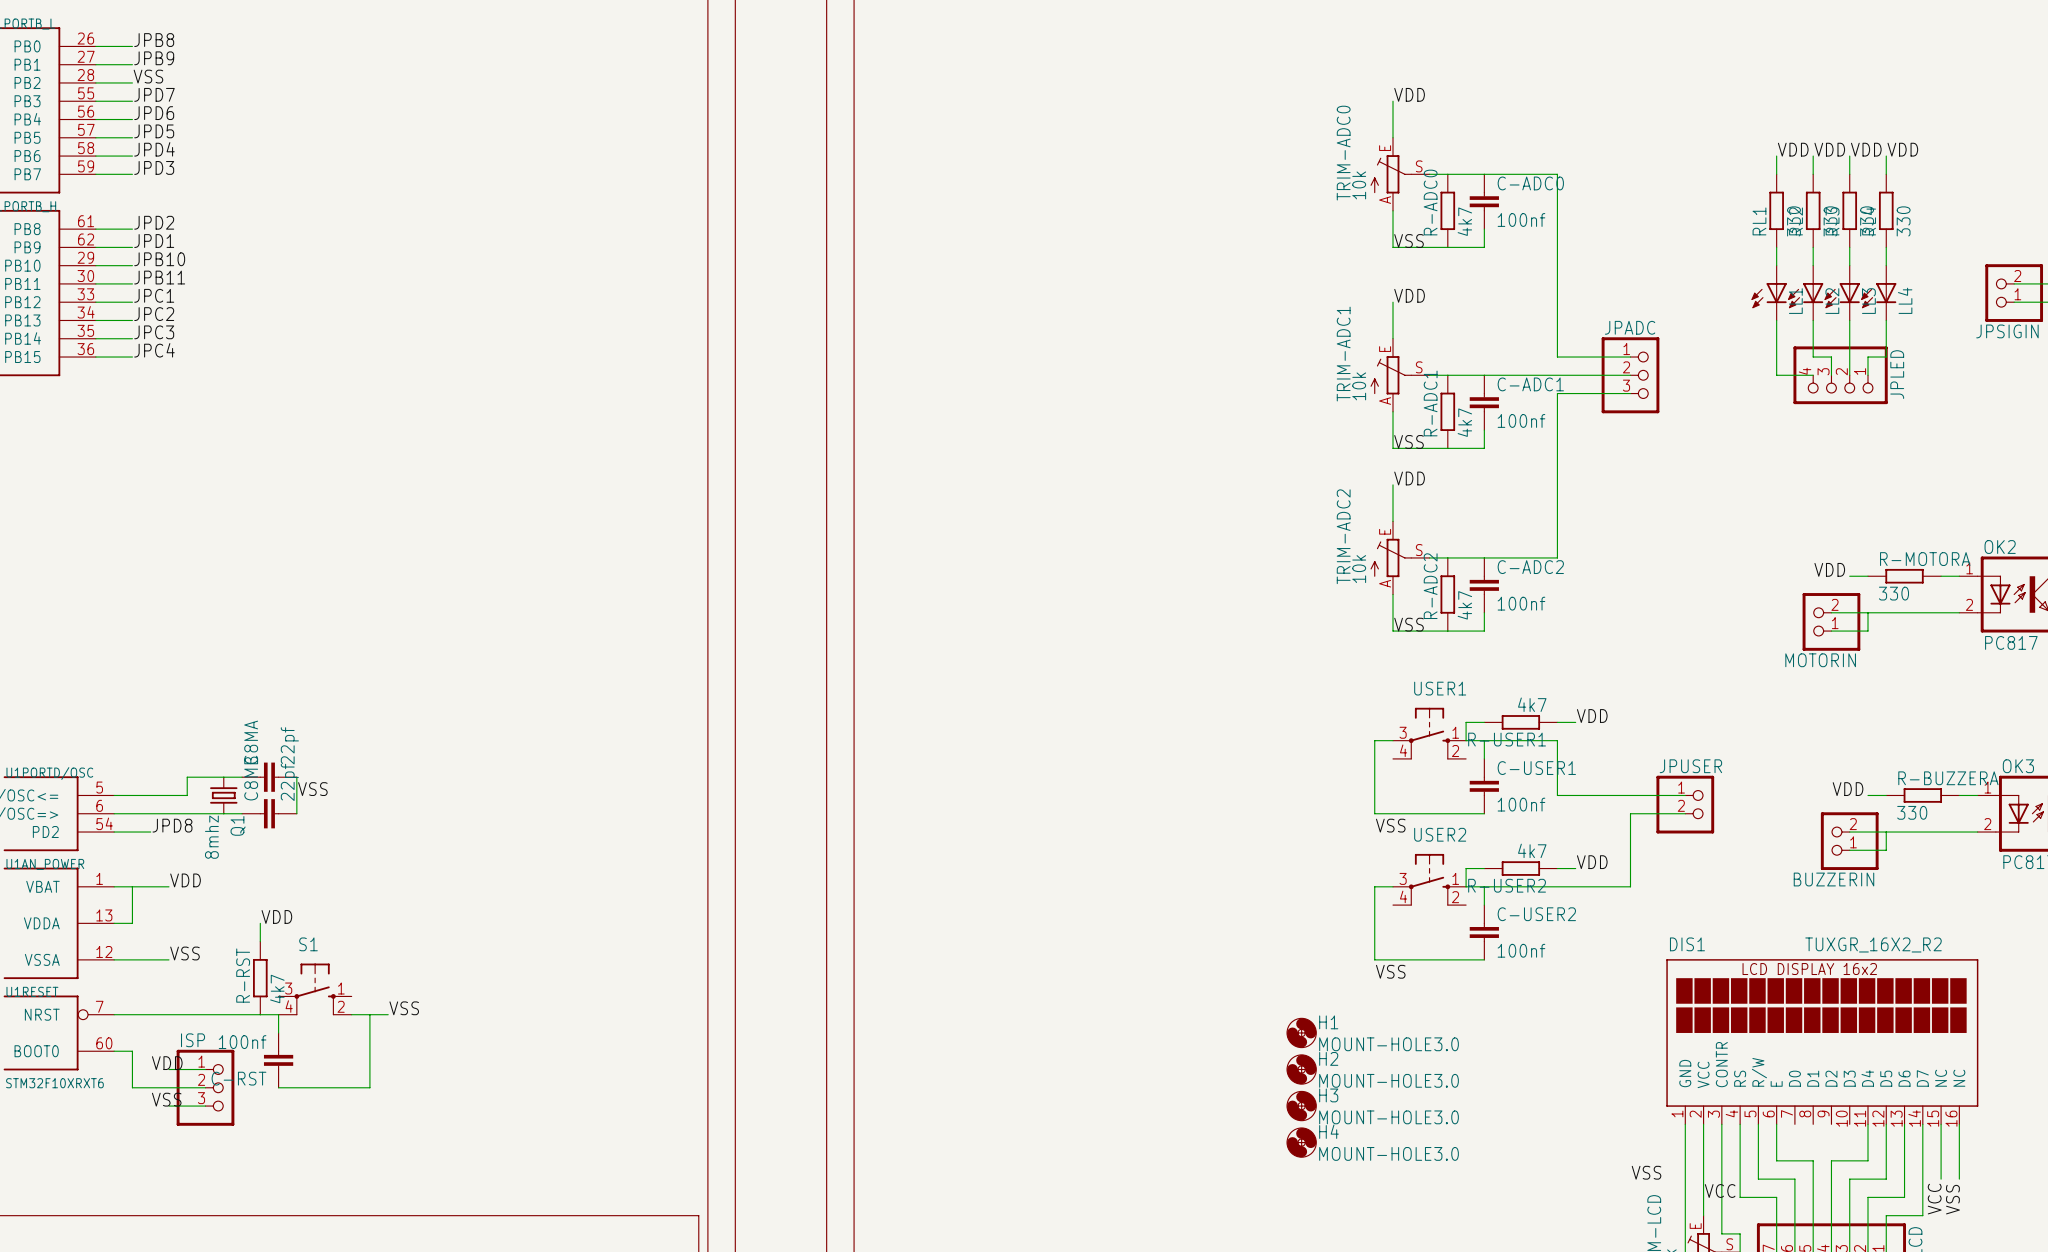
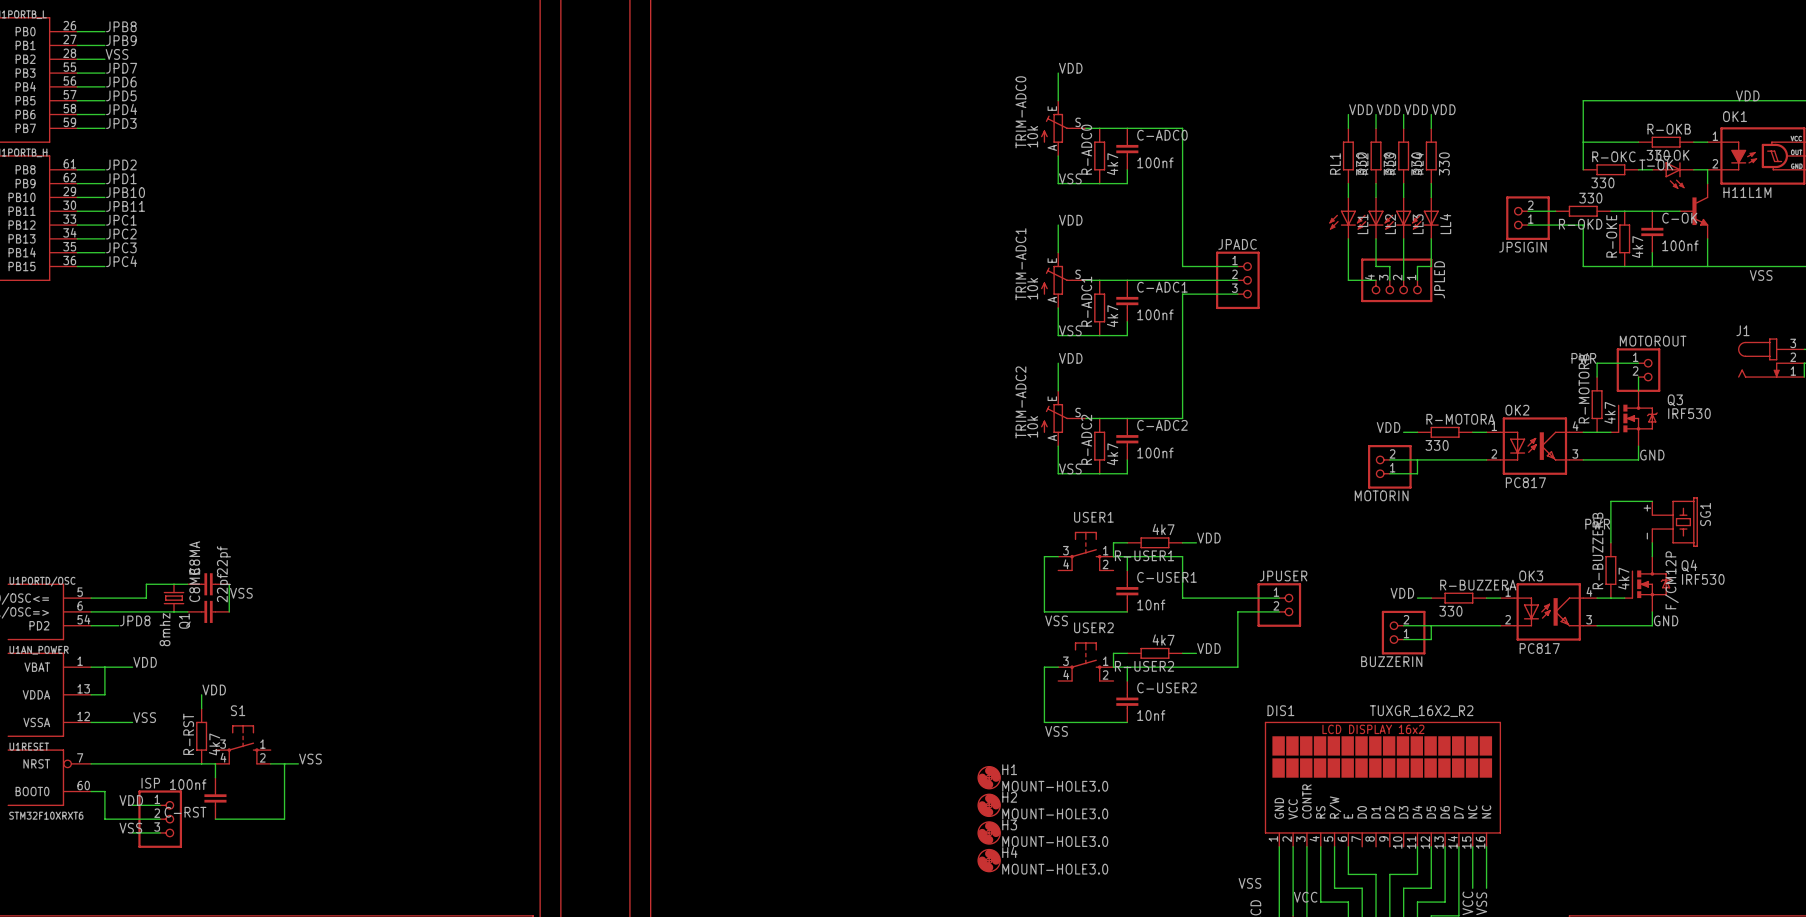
C-USER1 value: 100nf (1521, 804) -> 10nf (1151, 605)
C-USER2 value: 100nf (1521, 950) -> 10nf (1151, 715)

